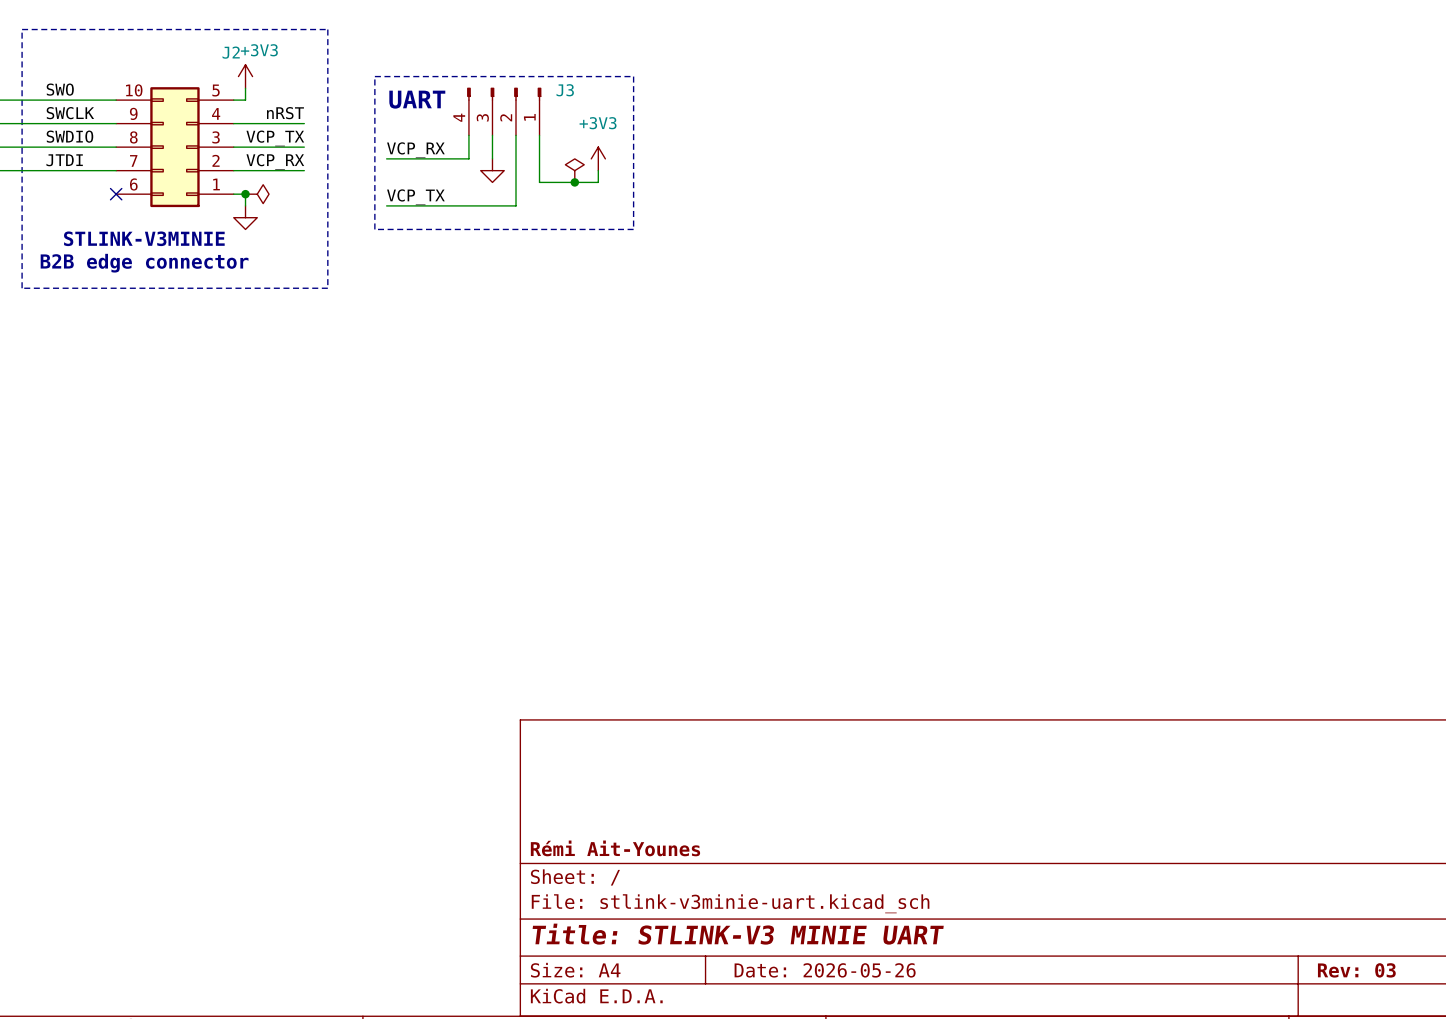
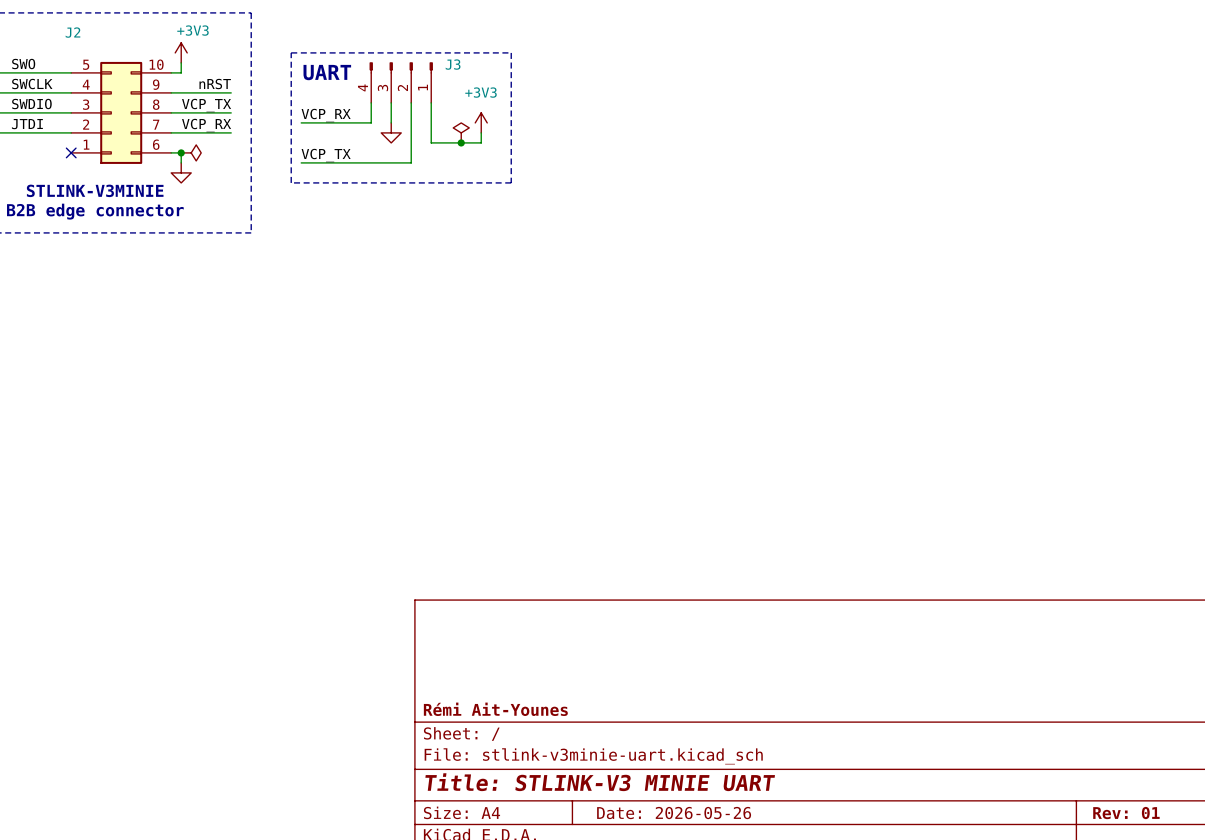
J2 flip: as is (174, 147) -> left-right (121, 112)
title block: Rev: 03 (1356, 970) -> Rev: 01 (1126, 813)

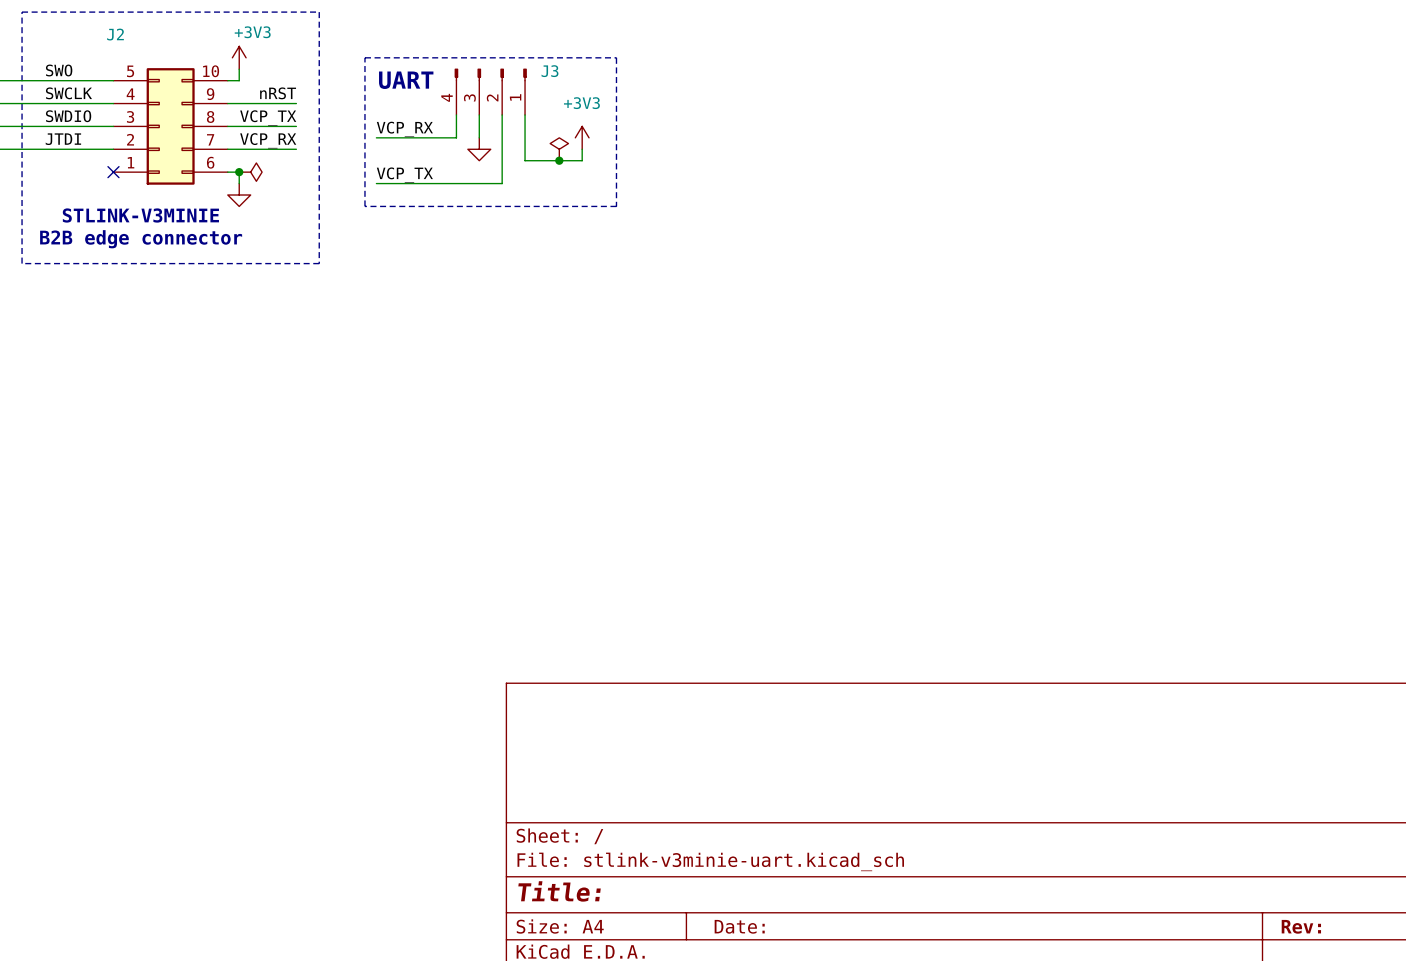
title block: Rémi Ait-Younes (495, 709) -> none
title block: Title: STLINK-V3 MINIE UART (600, 782) -> Title: (559, 891)
title block: Date: 2026-05-26 (674, 813) -> Date: (739, 926)
title block: Rev: 01 (1126, 813) -> Rev: (1301, 926)

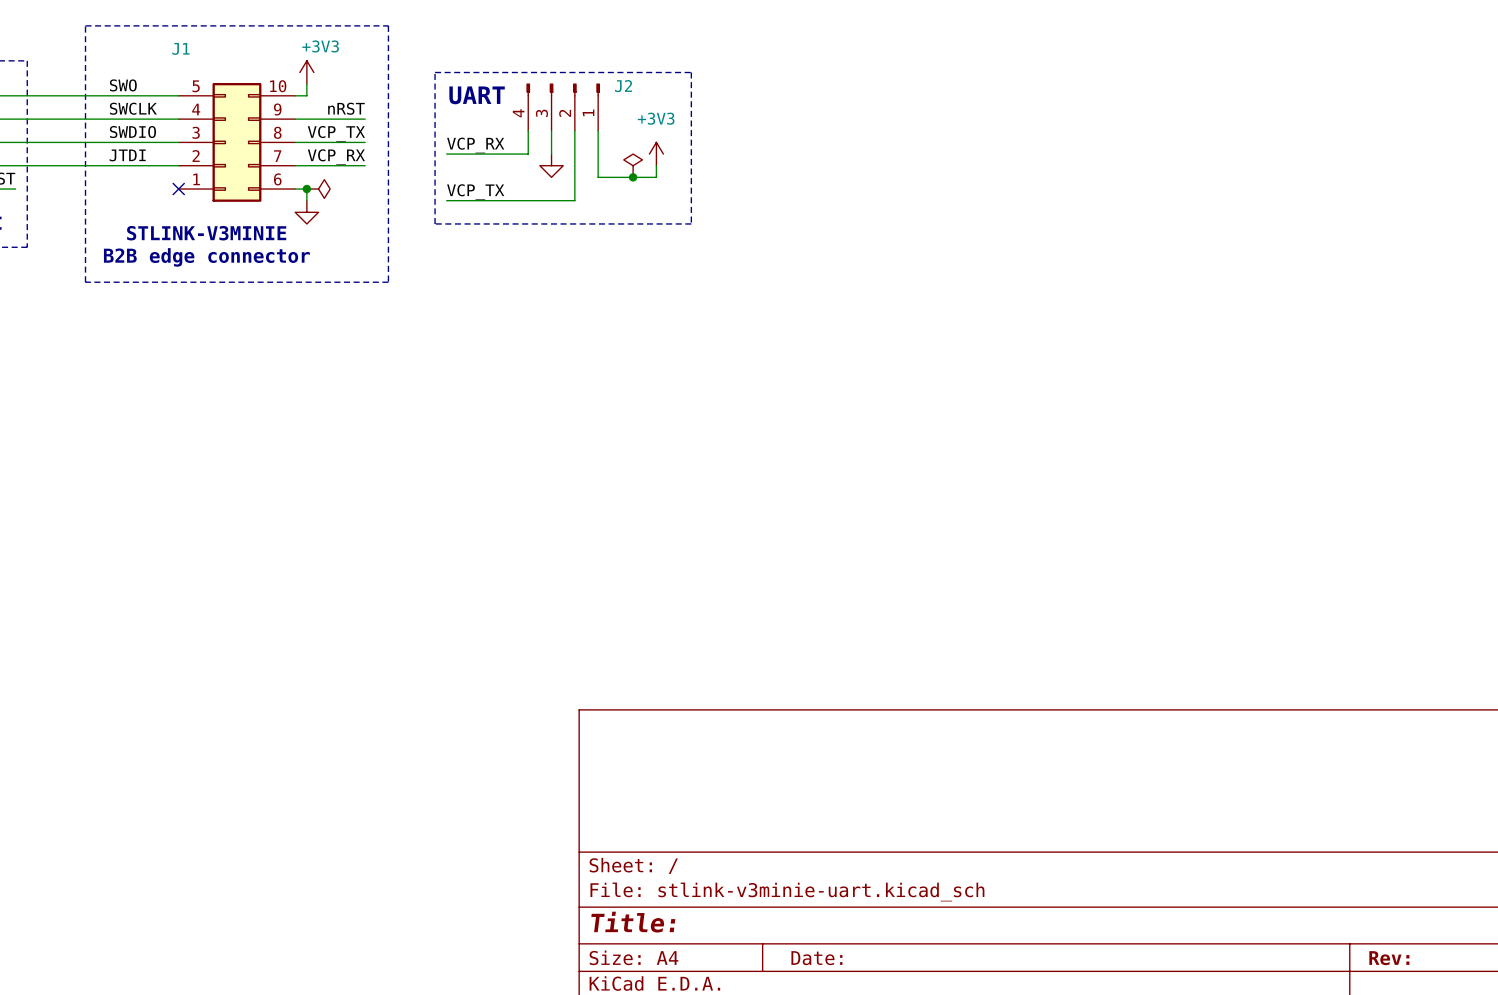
J2 name: J2 (115, 34) -> J1 (180, 48)
J3 name: J3 (550, 71) -> J2 (623, 86)

